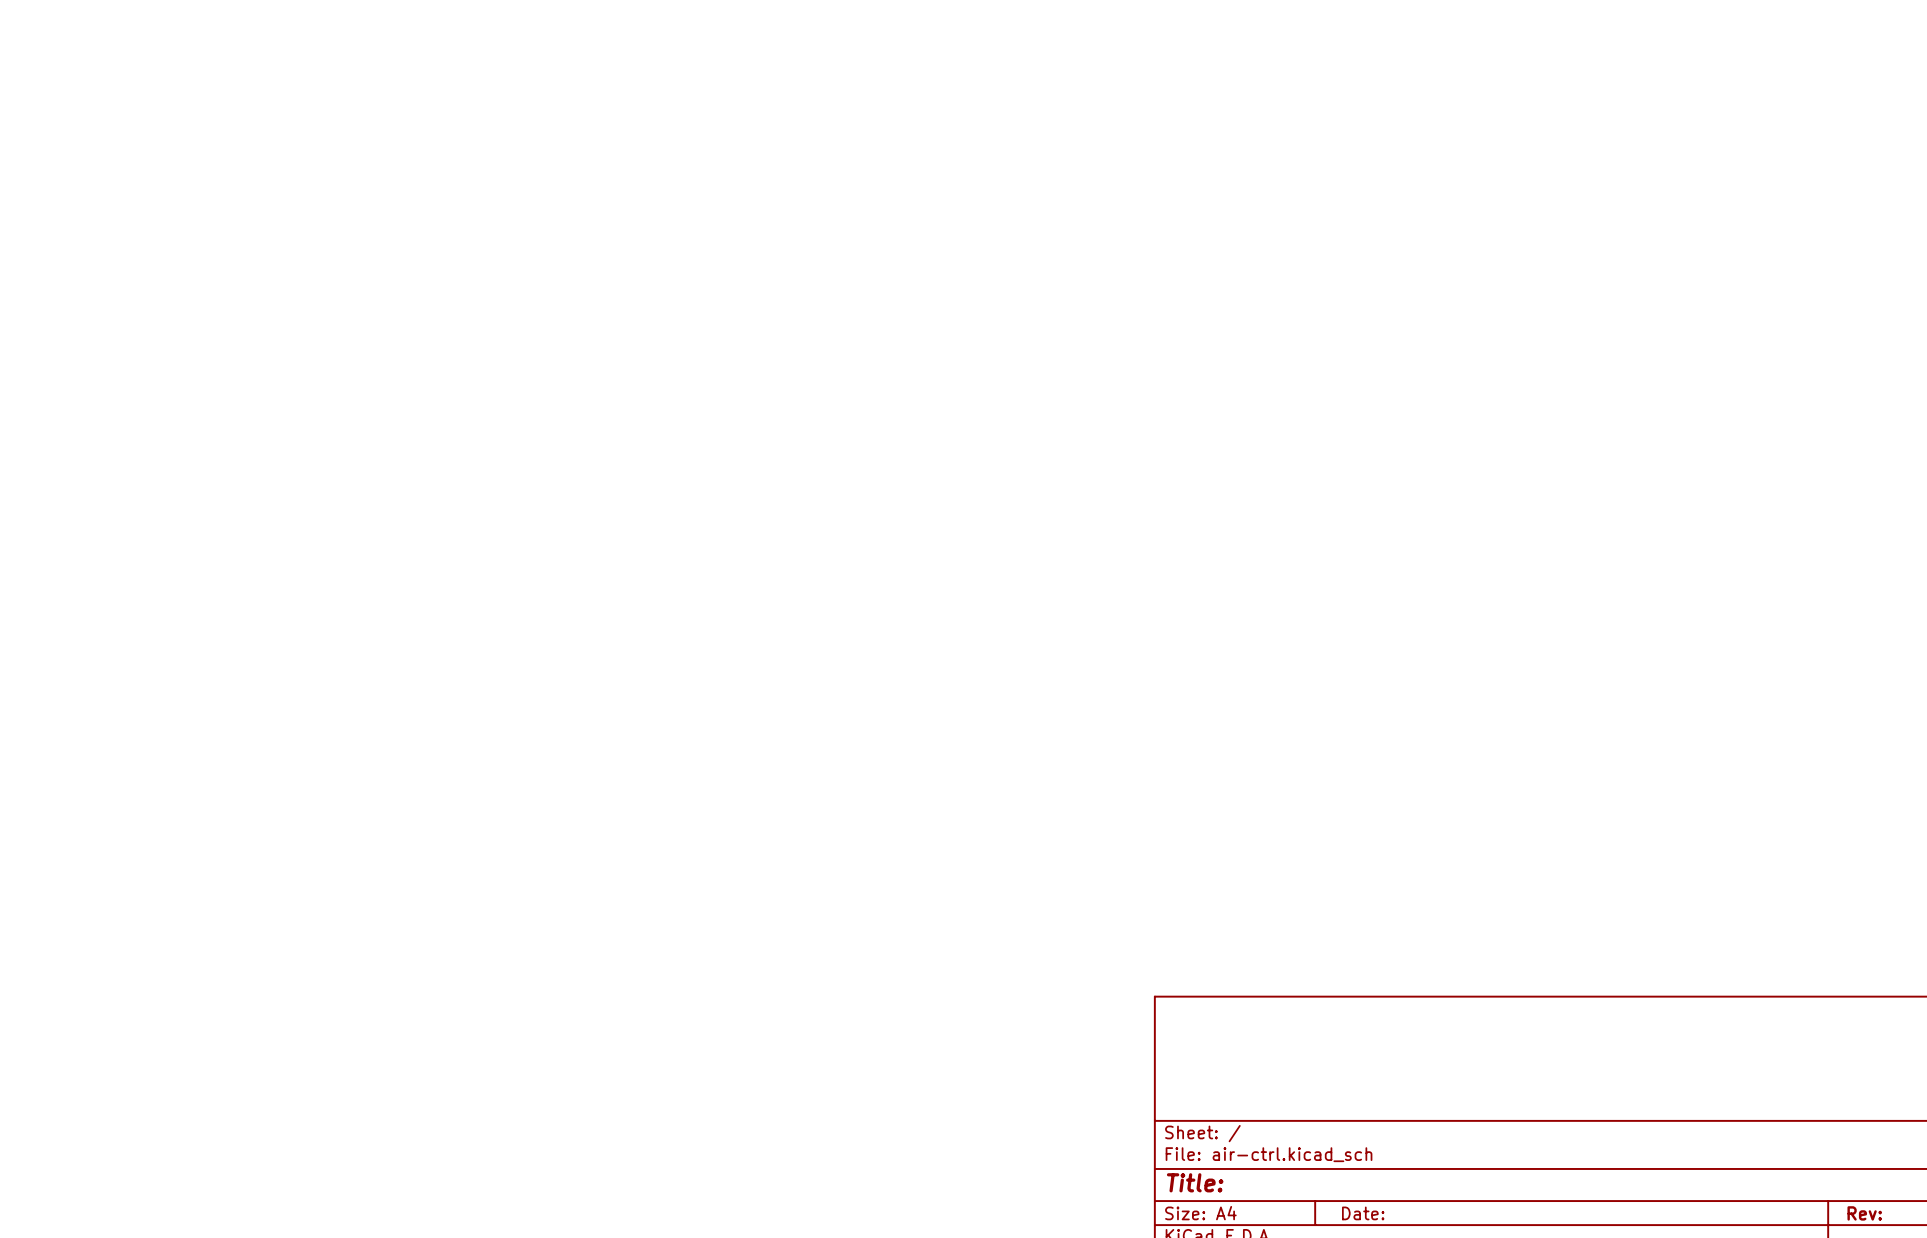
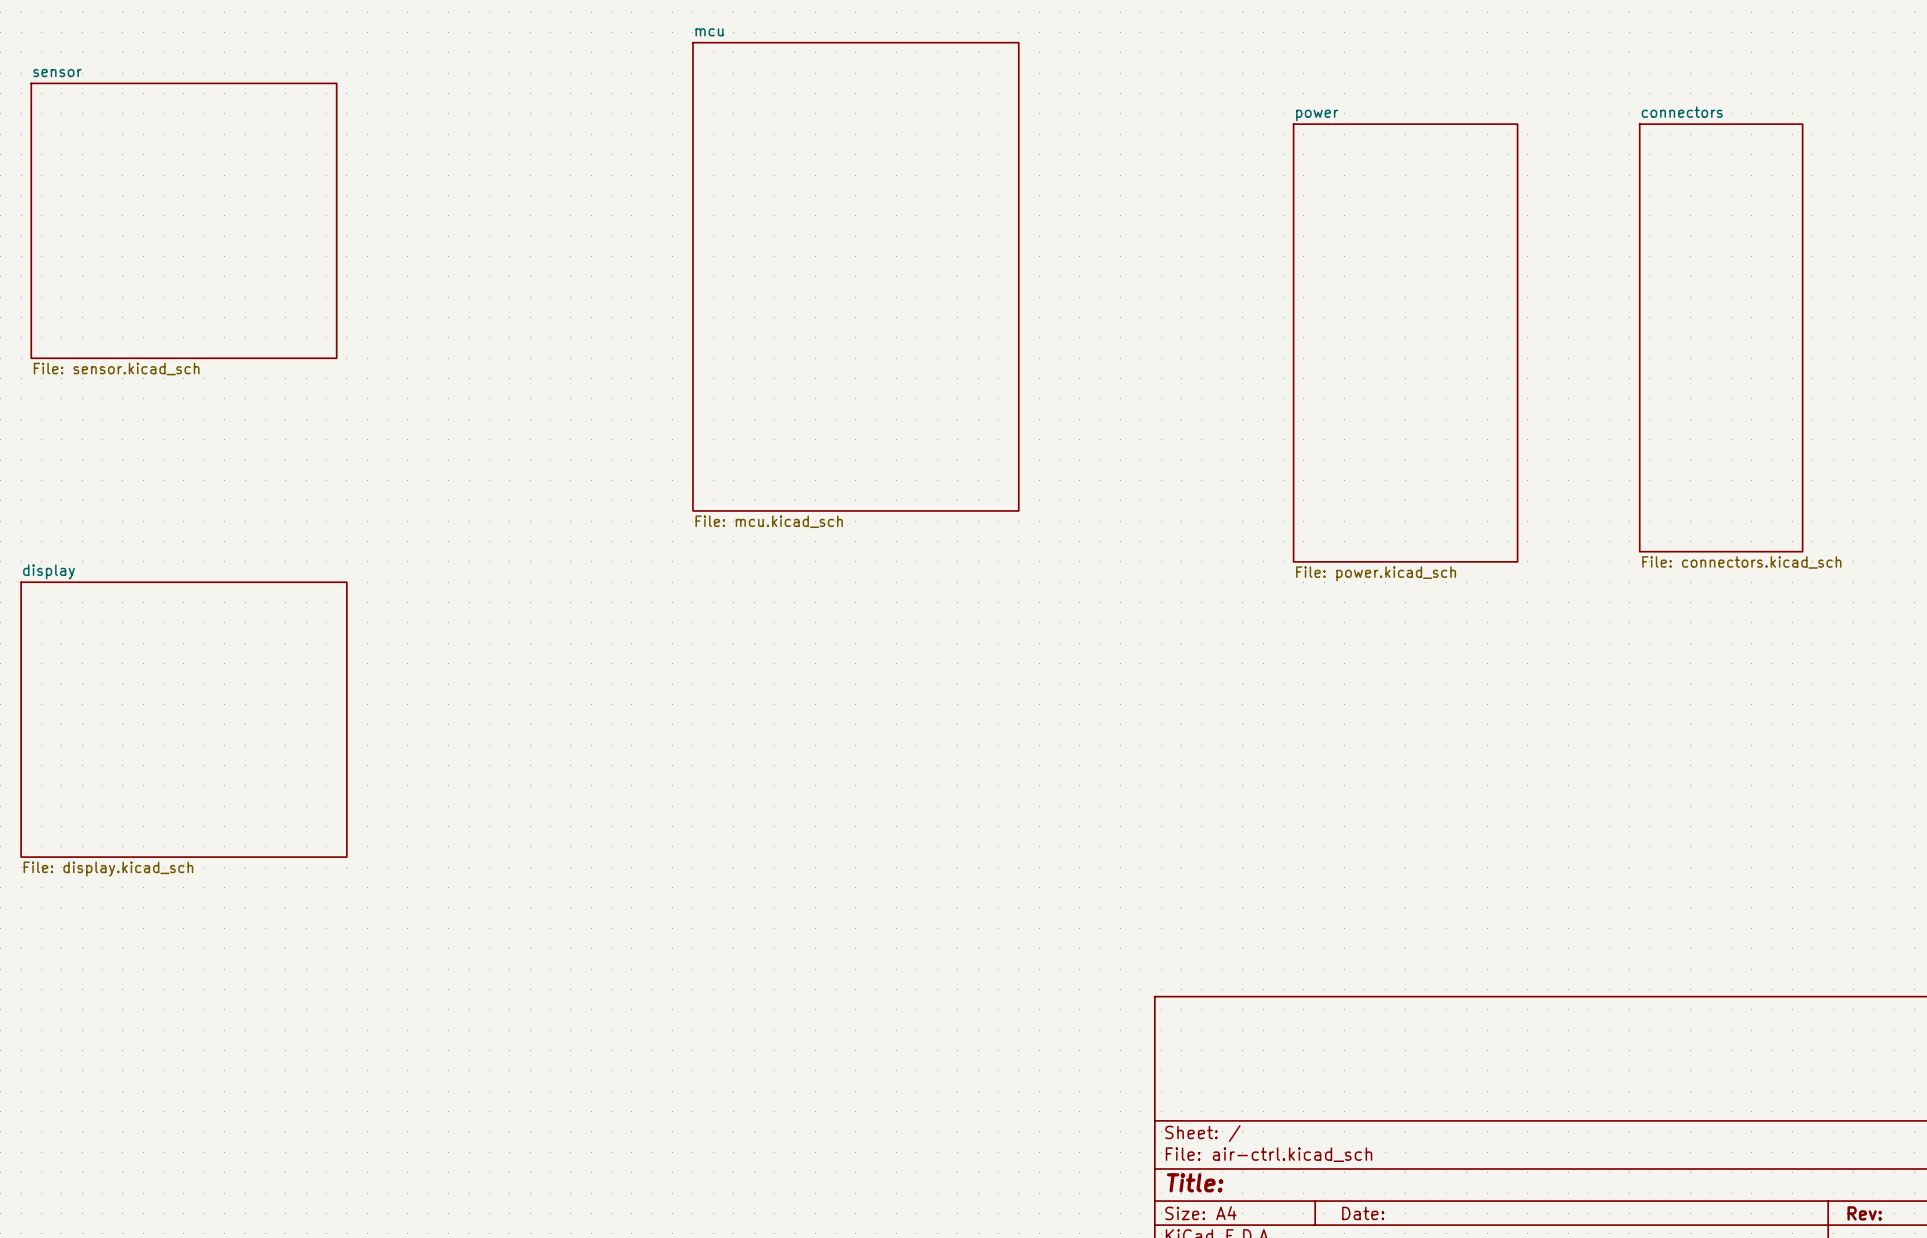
sheet sensor: none -> File: sensor.kicad_sch (183, 220)
sheet mcu: none -> File: mcu.kicad_sch (855, 276)
sheet connectors: none -> File: connectors.kicad_sch (1721, 337)
sheet power: none -> File: power.kicad_sch (1405, 343)
sheet display: none -> File: display.kicad_sch (183, 719)

